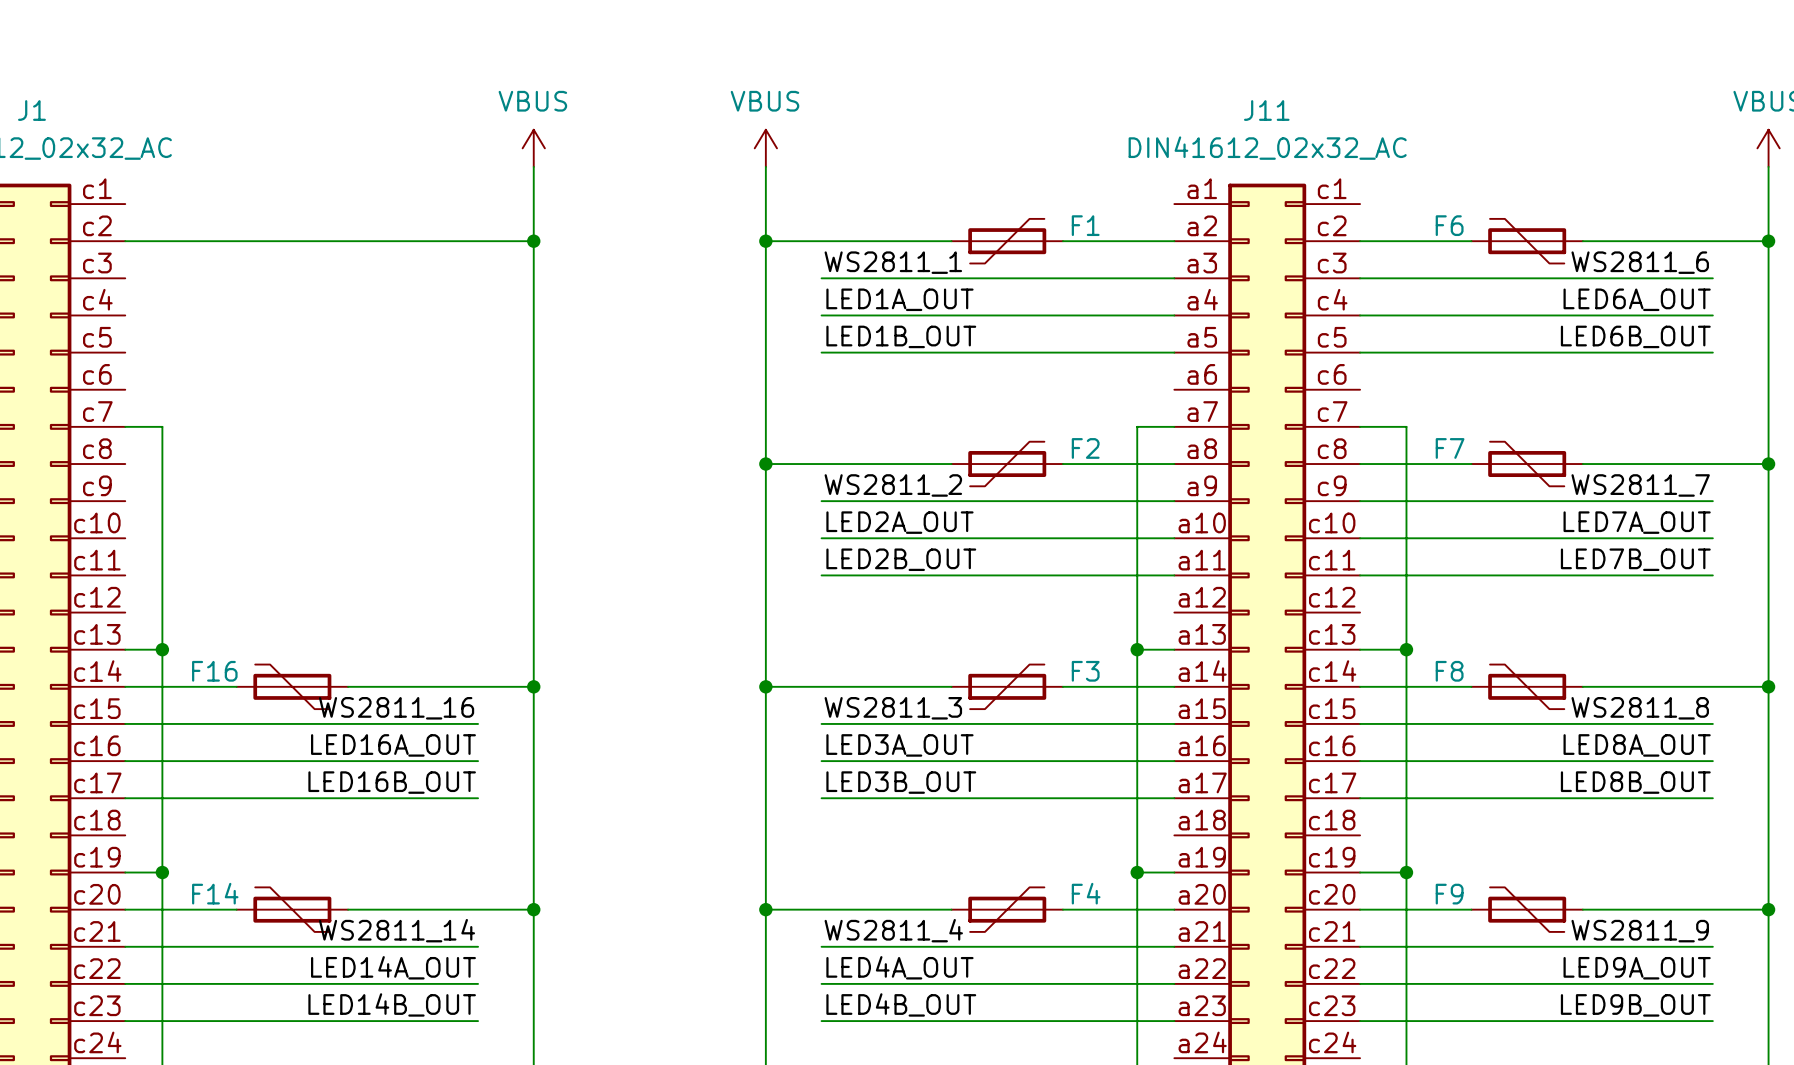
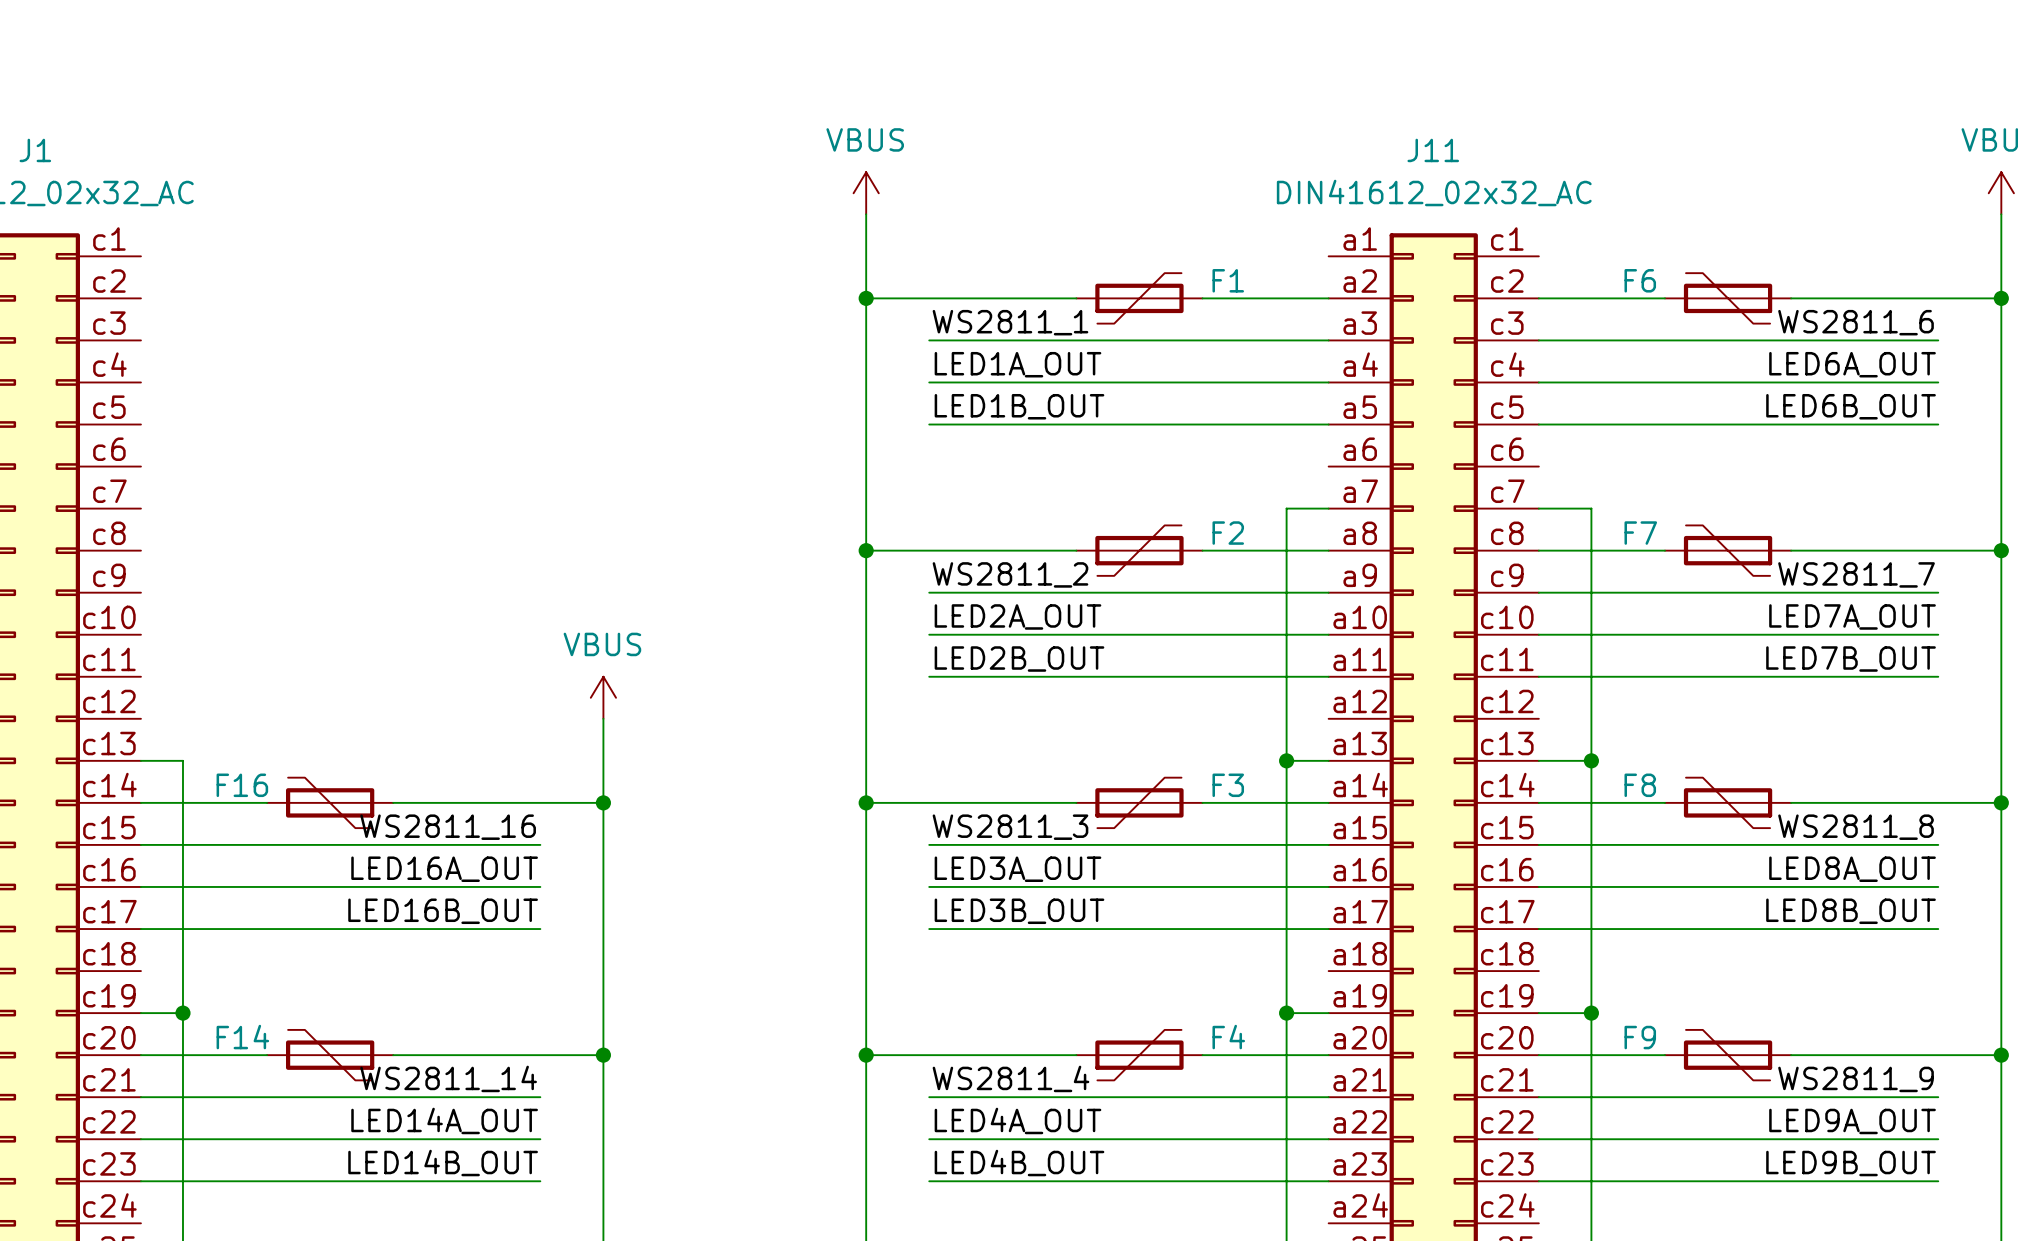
power symbol: VBUS (533, 148) -> none
wire: (533, 166) (533, 612) -> none
wire: (125, 241) (533, 241) -> none
junction: (533, 241) -> none
wire: (125, 426) (162, 426) (162, 649) -> none
power symbol: none -> VBUS (603, 697)
junction: (162, 649) -> none

